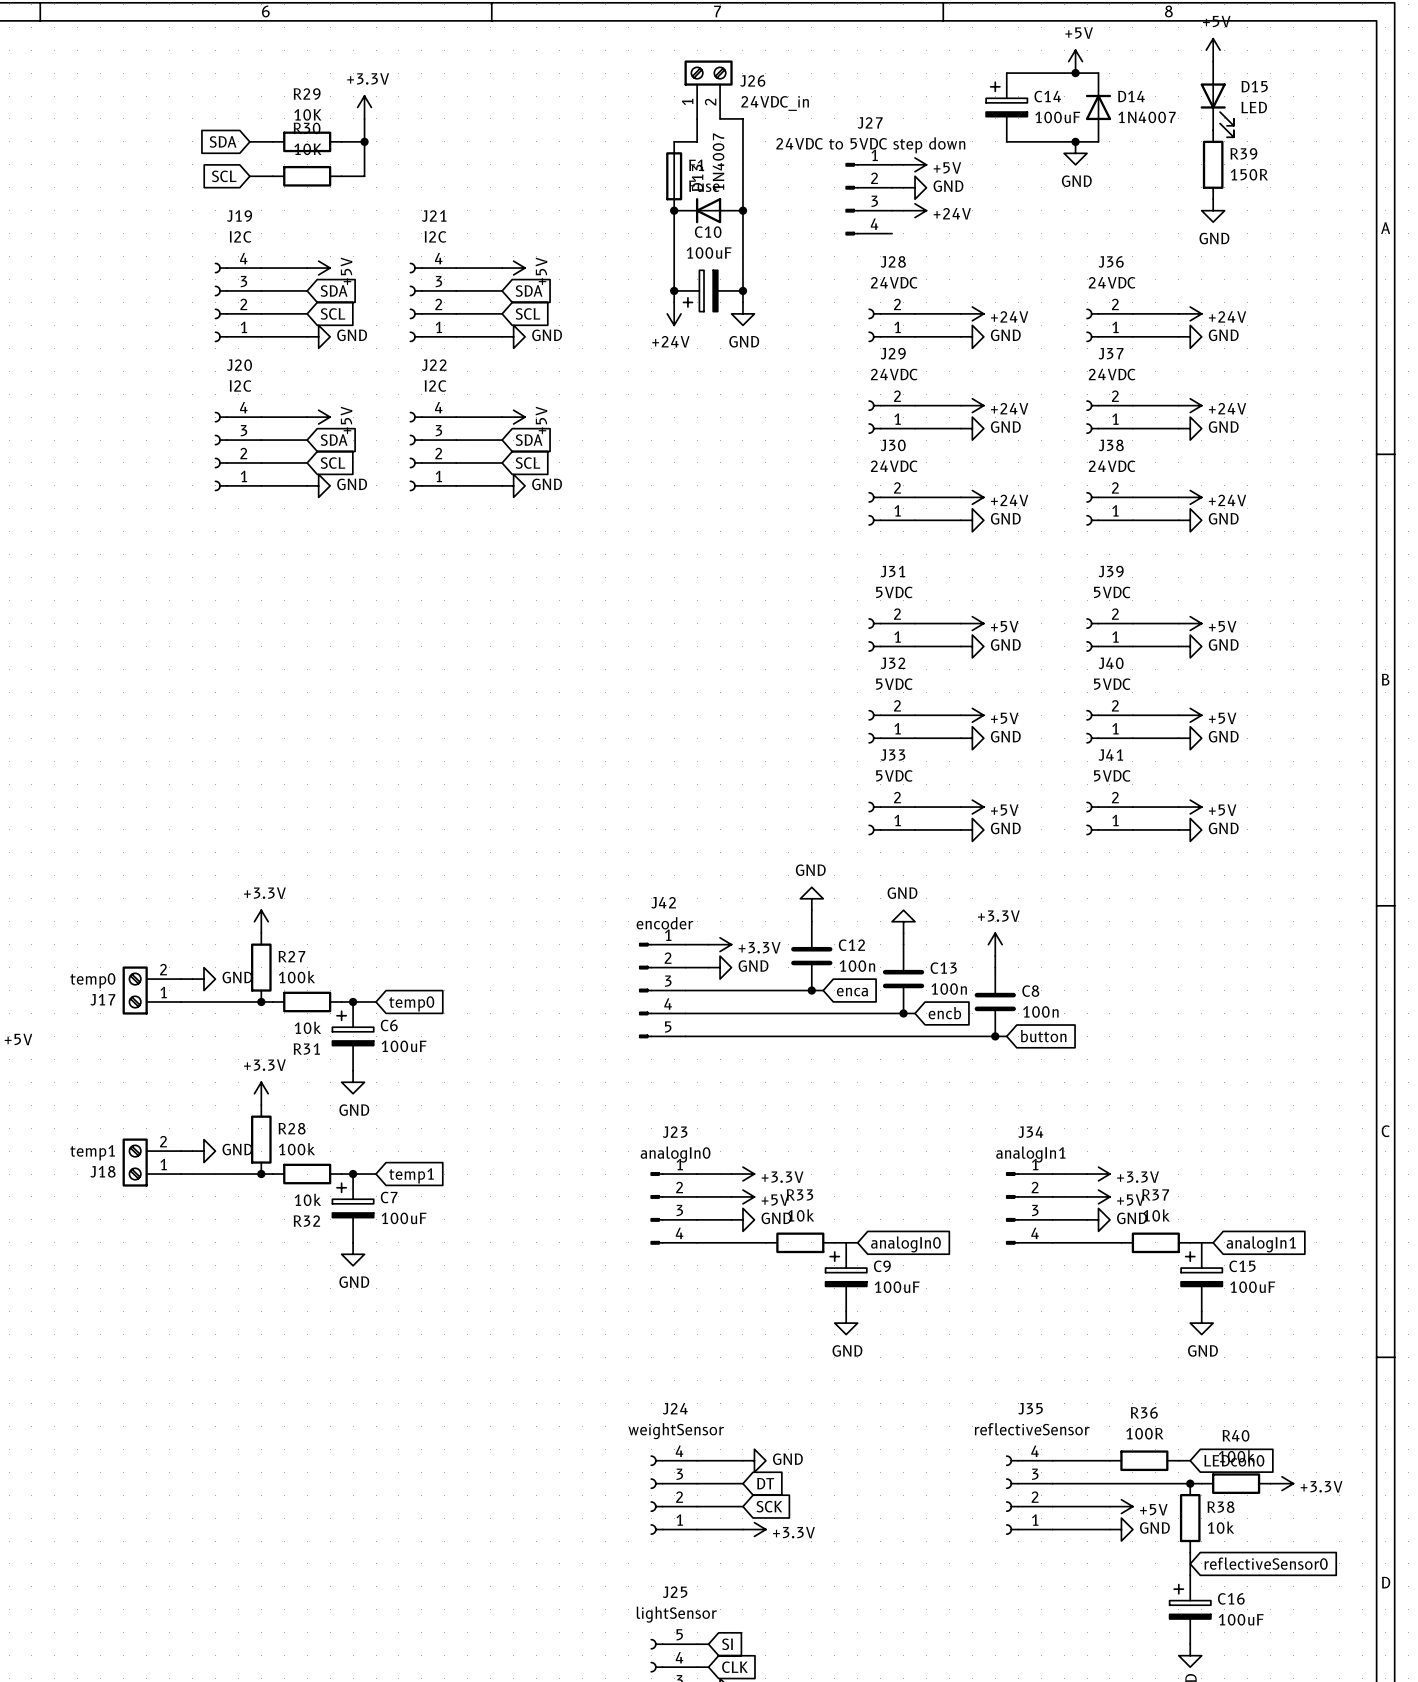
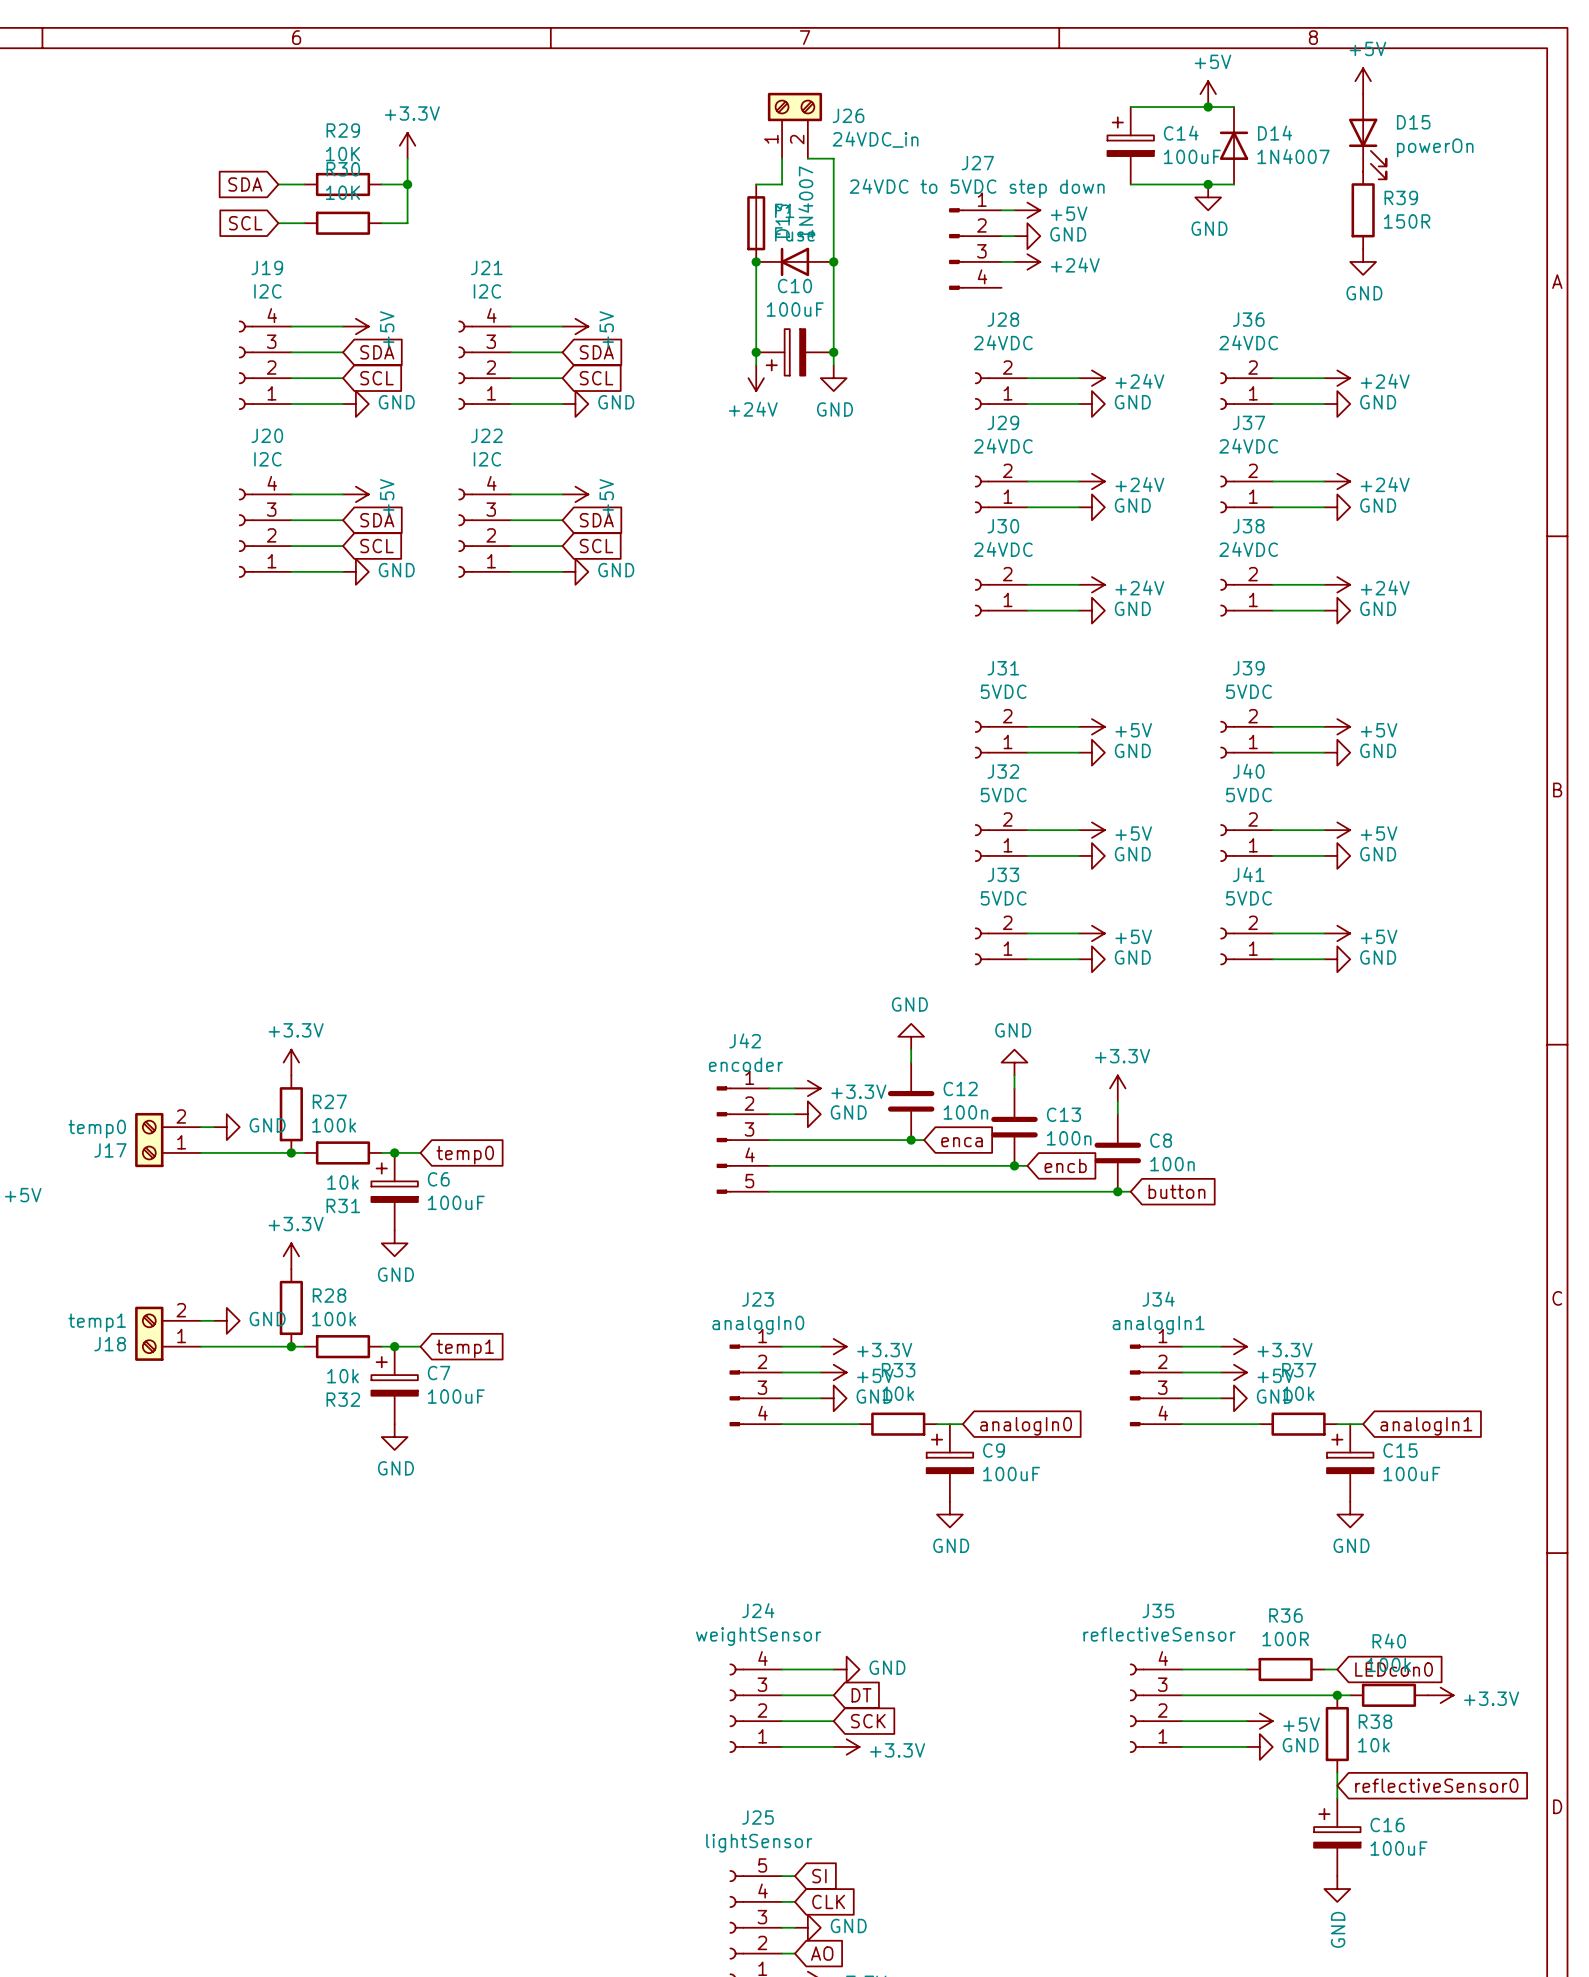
D15 value: LED (1254, 107) -> powerOn (1435, 147)

